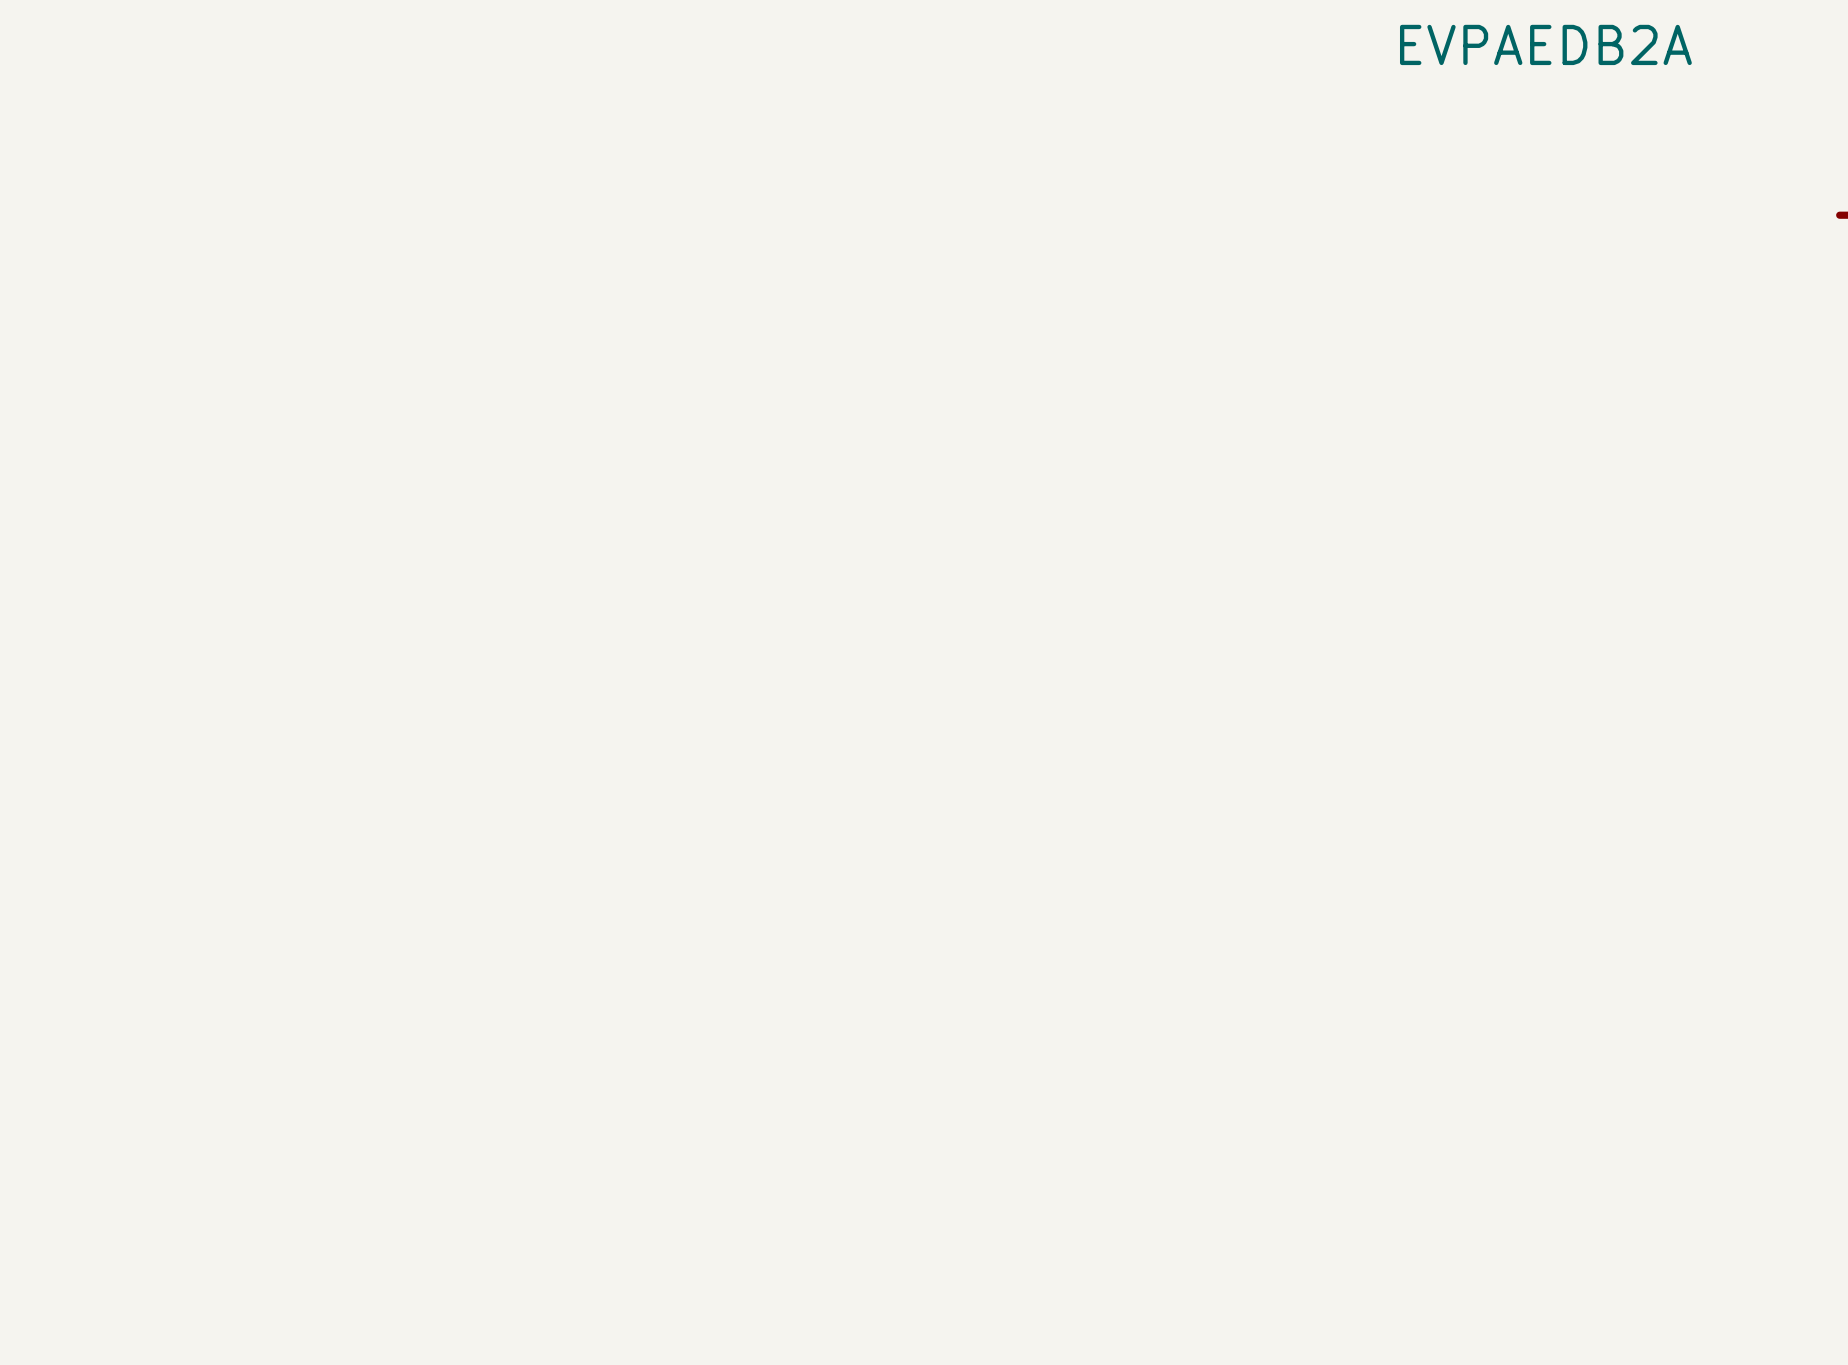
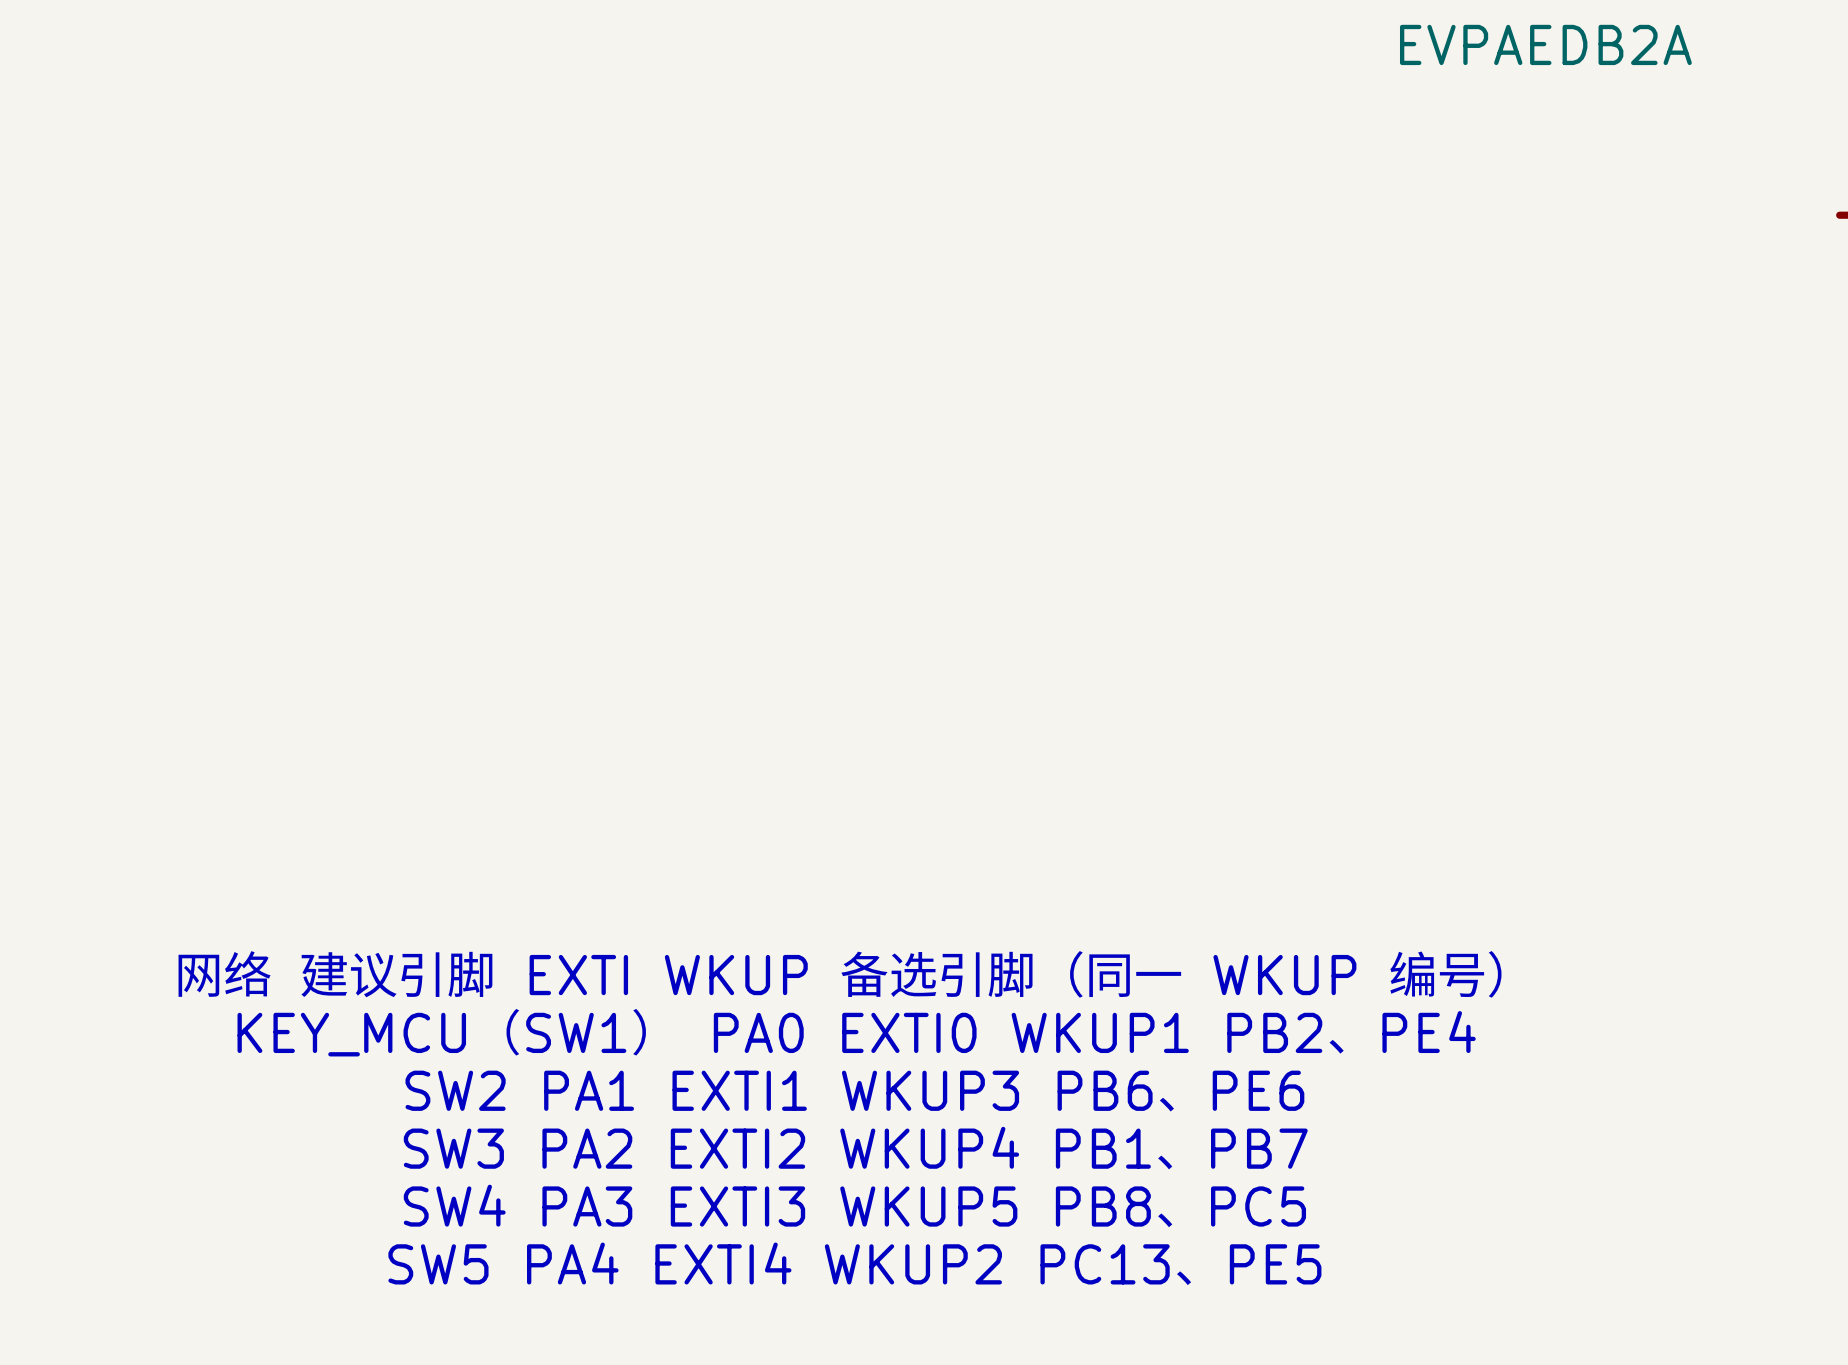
text: none -> 网络 建议引脚 EXTI WKUP 备选引脚（同一 WKUP 编号） (840, 974)
text: none -> KEY_MCU（SW1） PA0 EXTI0 WKUP1 PB2、PE4 (856, 1032)
text: none -> SW2 PA1 EXTI1 WKUP3 PB6、PE6 (854, 1092)
text: none -> SW3 PA2 EXTI2 WKUP4 PB1、PB7 (855, 1149)
text: none -> SW4 PA3 EXTI3 WKUP5 PB8、PC5 (854, 1207)
text: none -> SW5 PA4 EXTI4 WKUP2 PC13、PE5 (854, 1264)

